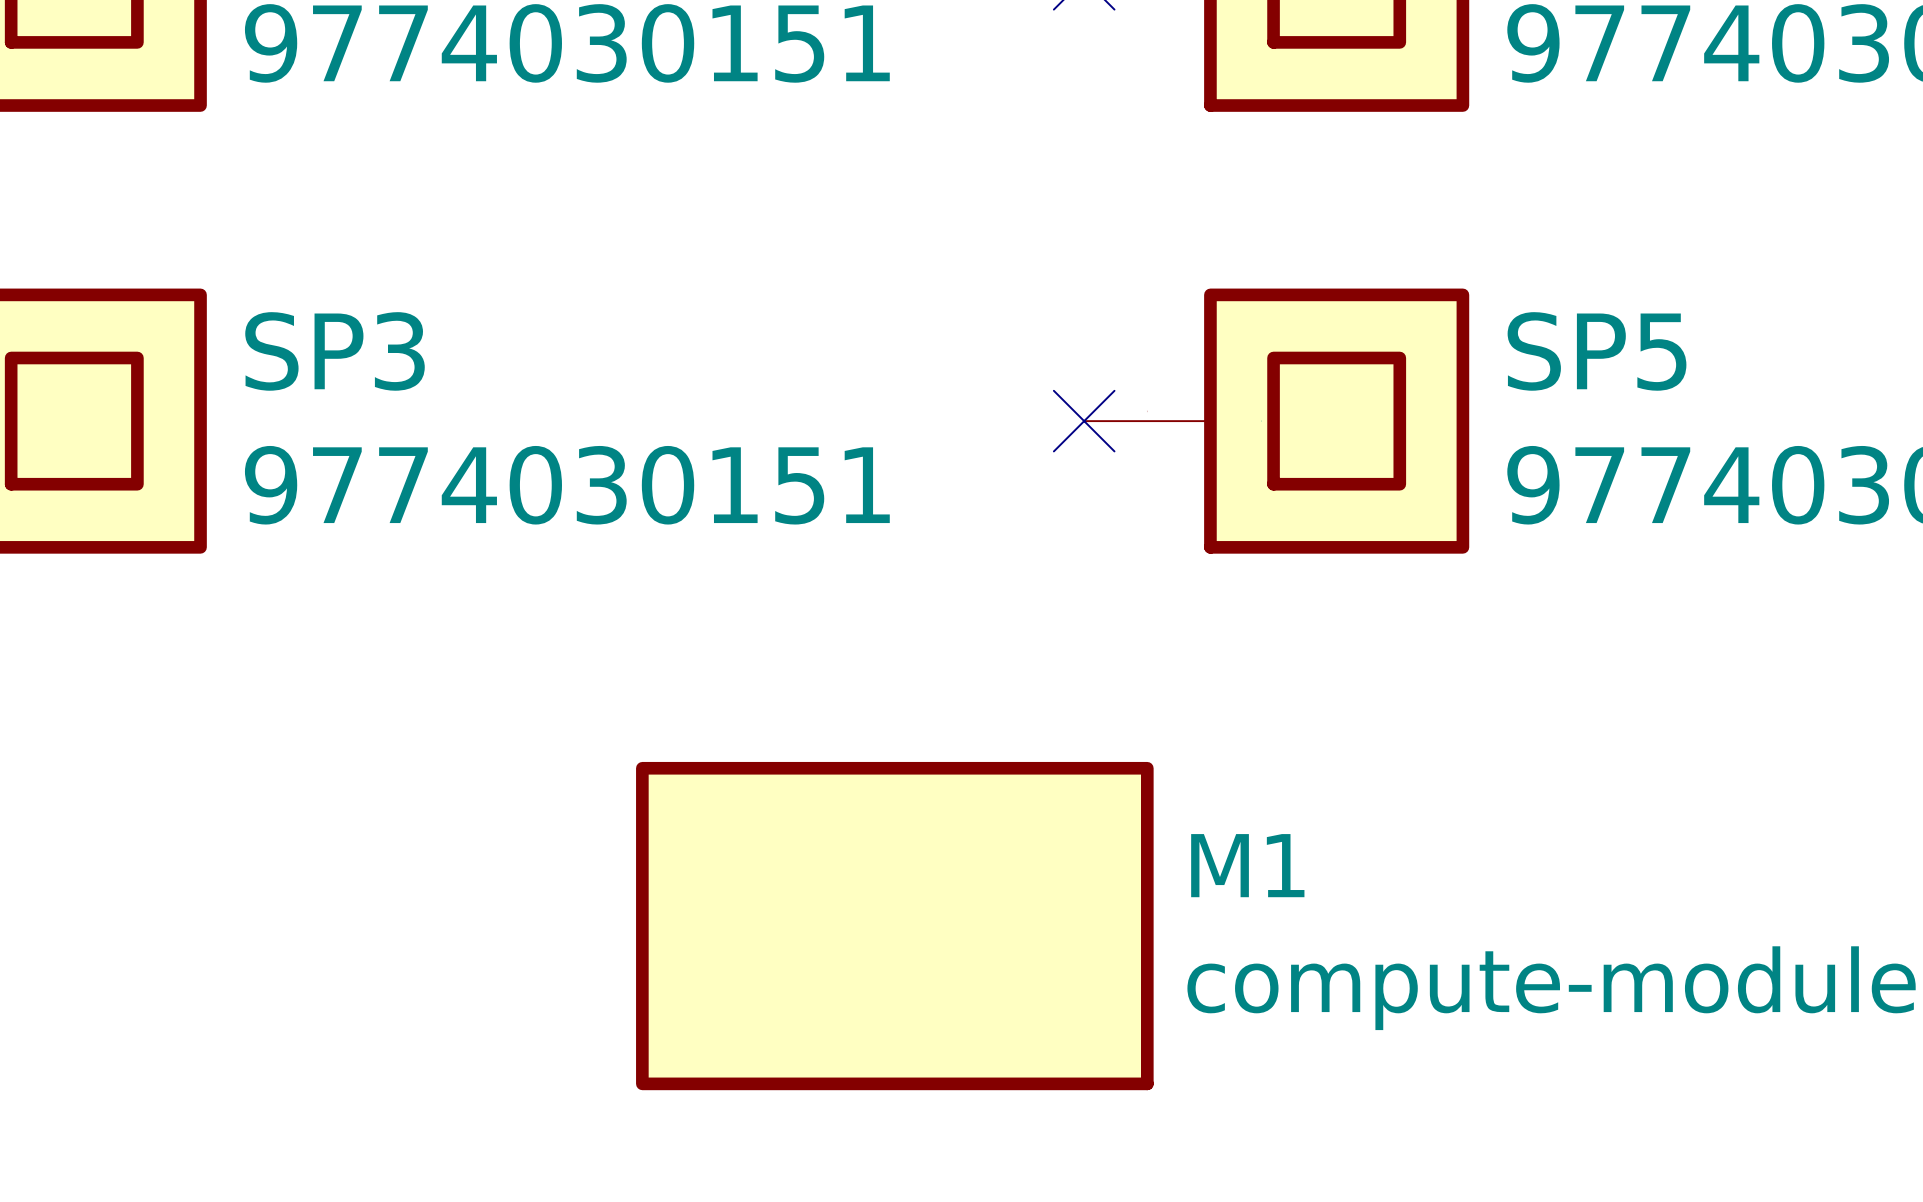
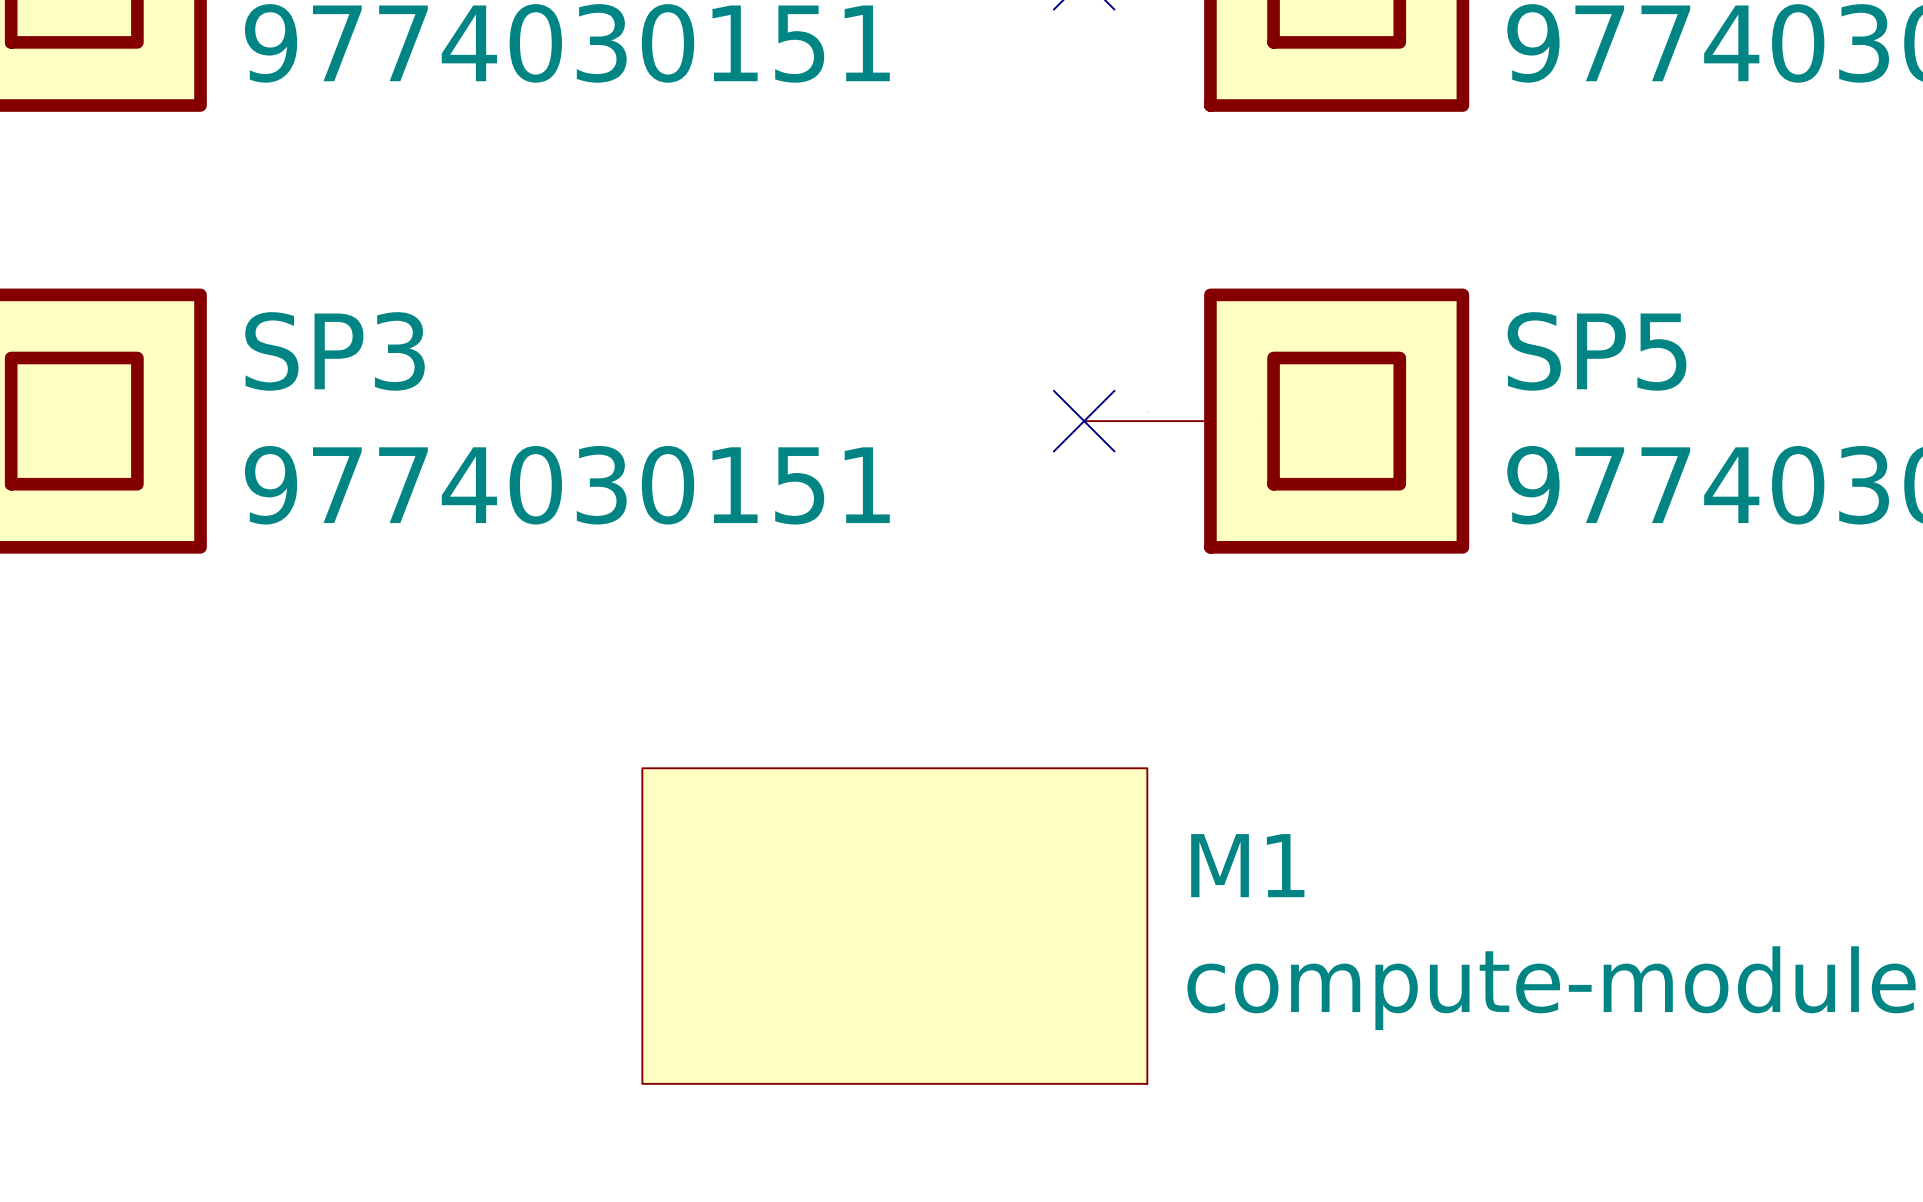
M1 symbol: [636, 761, 1154, 1091] -> [642, 768, 1148, 1084]

